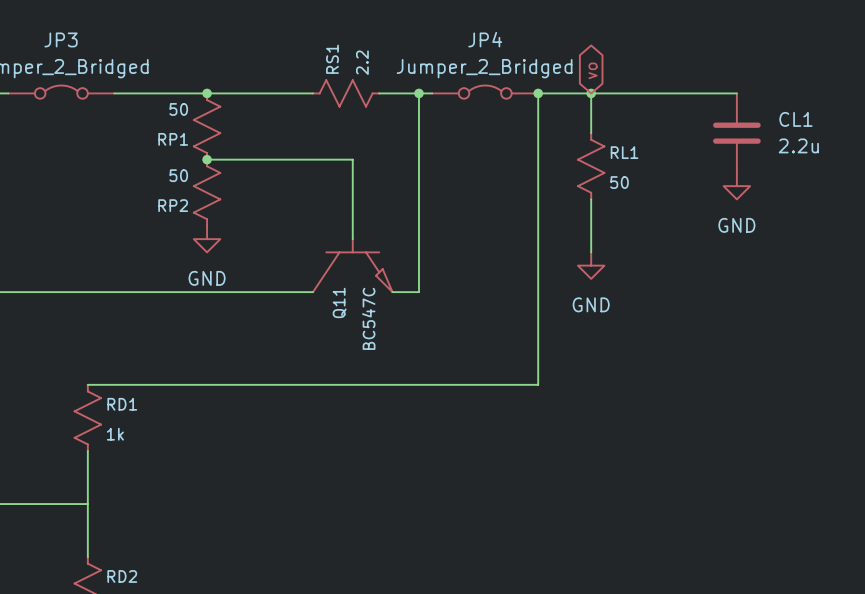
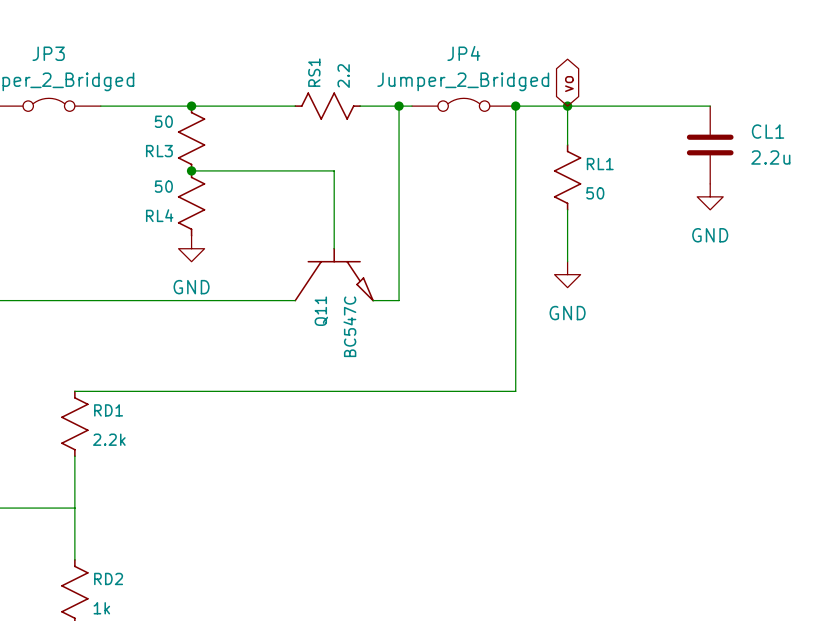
RP1 name: RP1 (173, 139) -> RL3 (159, 151)
RP2 name: RP2 (173, 205) -> RL4 (159, 215)
RD1 value: 1k (115, 434) -> 2.2k (109, 439)

